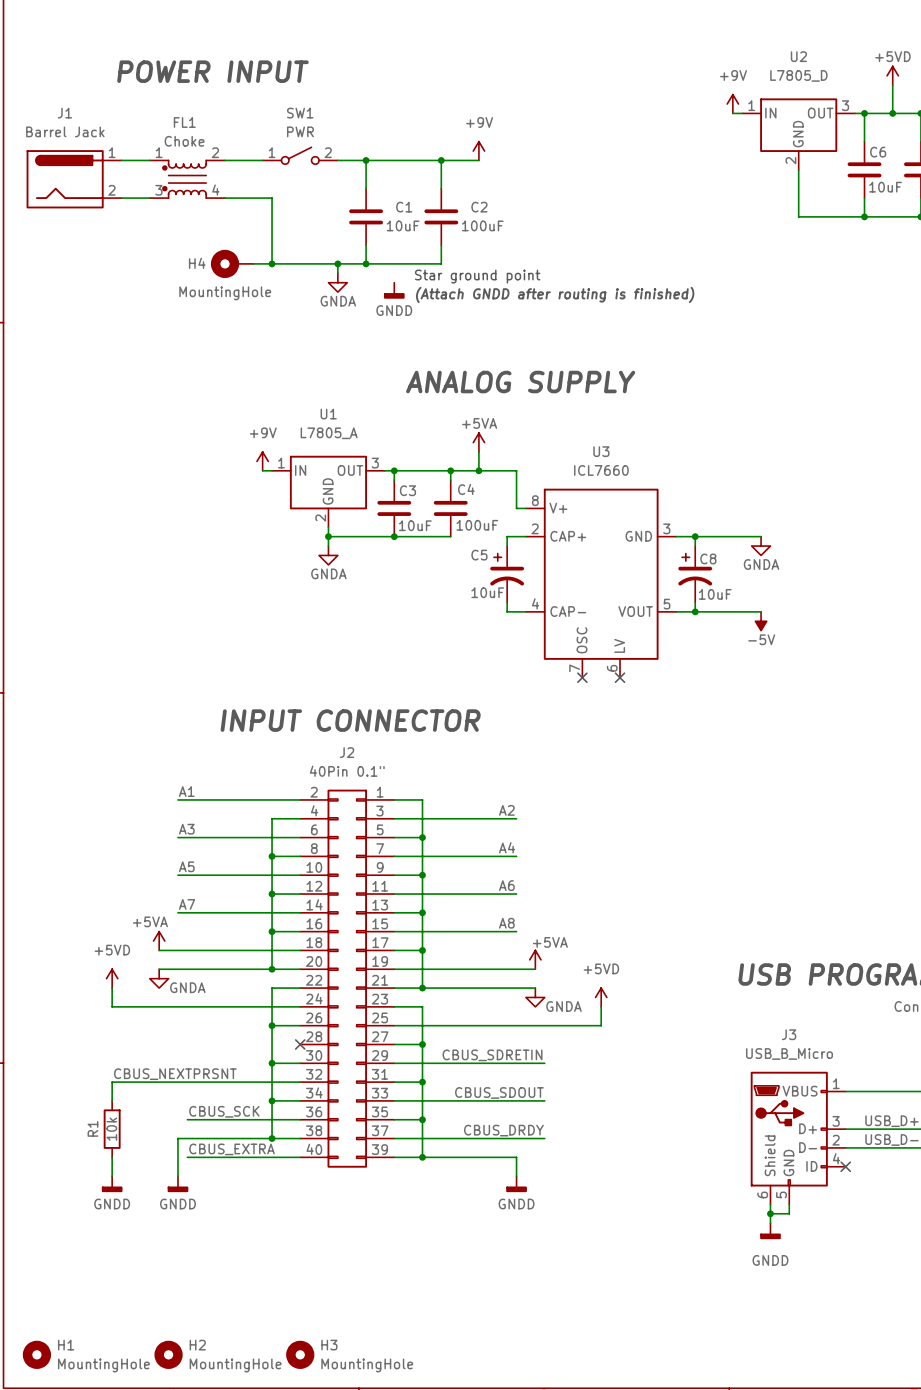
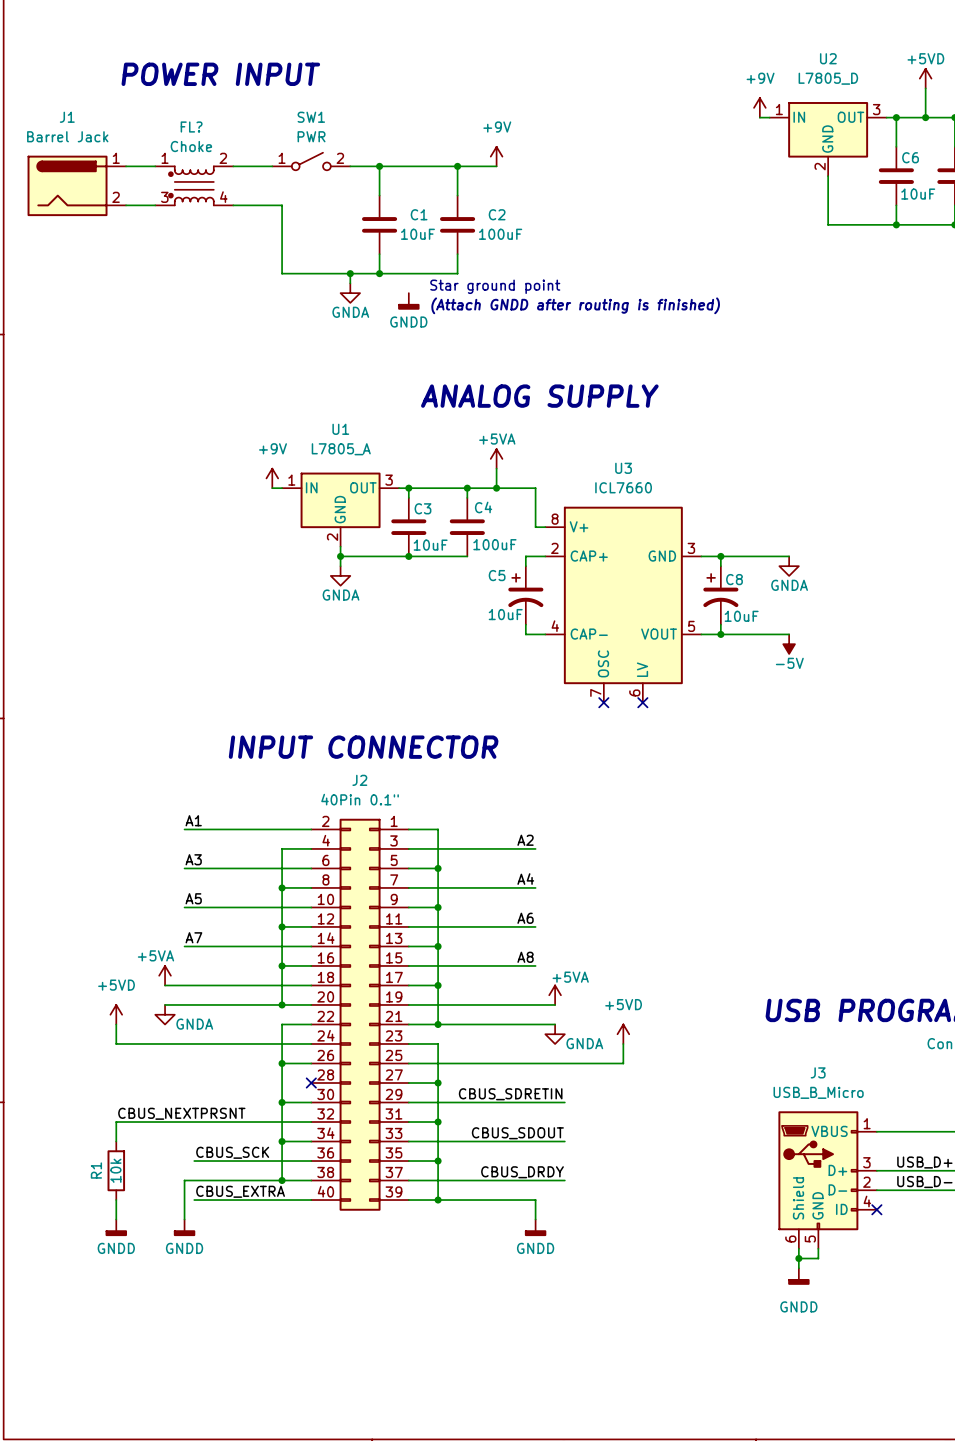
FL1 name: FL1 (184, 122) -> FL? (191, 127)
H4: MountingHole (232, 263) -> none
wire: (253, 263) (272, 263) -> none
junction: (272, 263) -> none
H1: MountingHole (36, 1354) -> none
H2: MountingHole (168, 1354) -> none
H3: MountingHole (300, 1354) -> none

